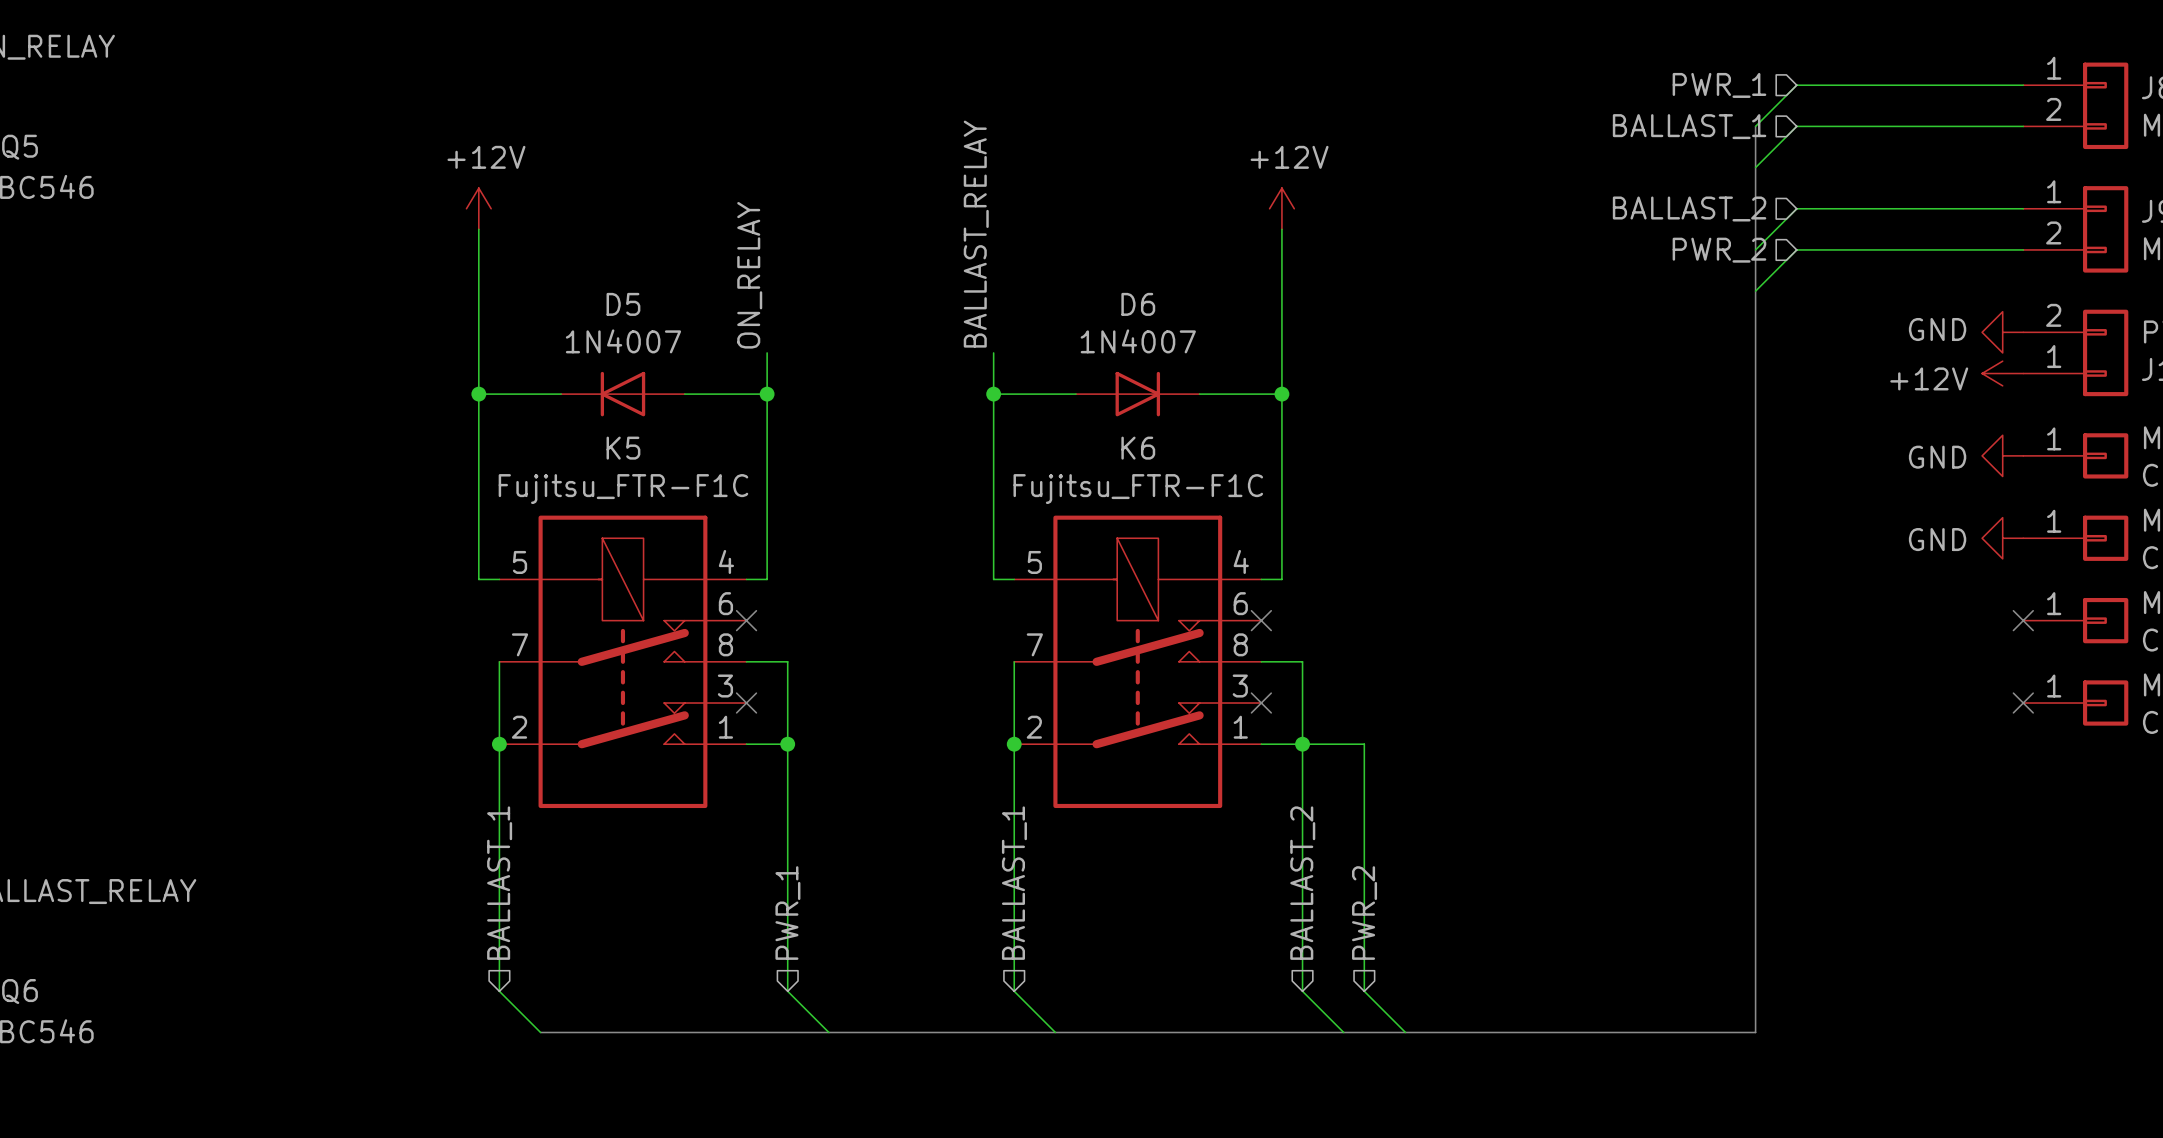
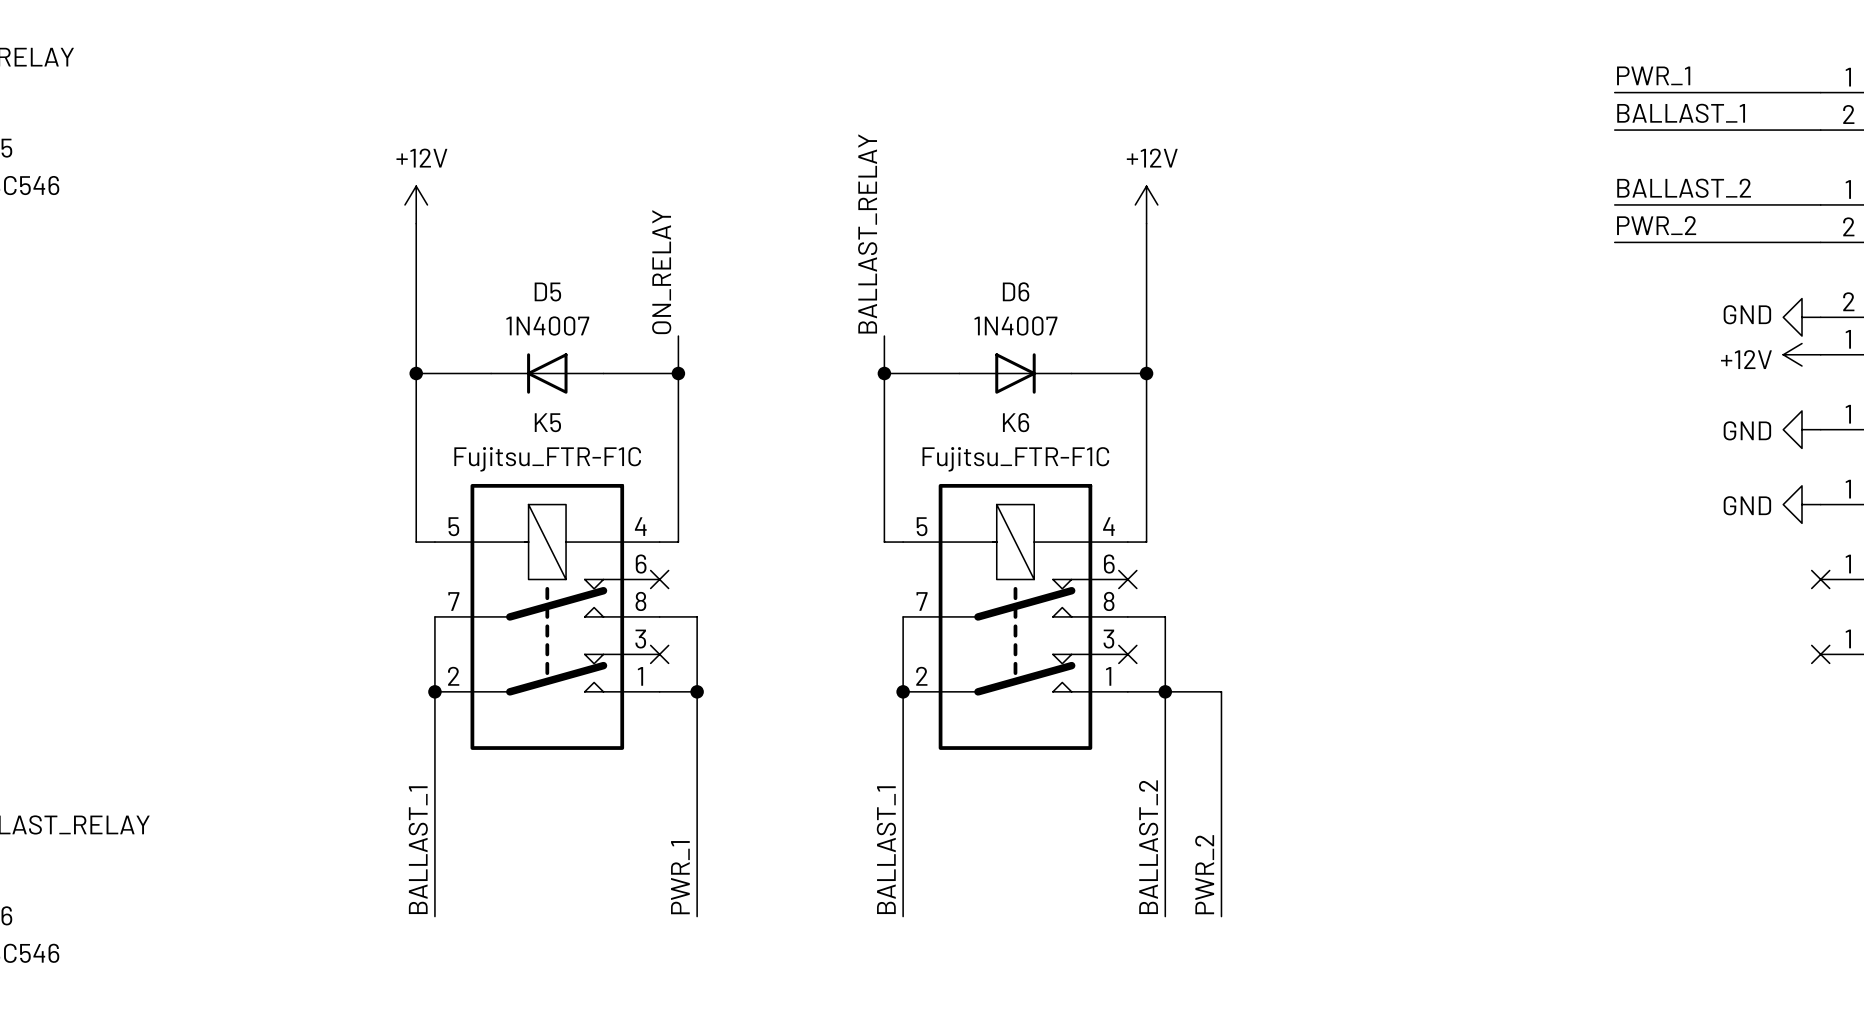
label: none -> PWR_1 (1653, 75)
hierarchical label: PWR_1 (1719, 85) -> none
wire: (1796, 85) (1755, 126) -> none
label: none -> BALLAST_1 (1681, 113)
hierarchical label: BALLAST_1 (1689, 126) -> none
bus: (1755, 126) (1755, 1032) (540, 1032) -> none
wire: (1796, 126) (1755, 167) -> none
label: none -> BALLAST_2 (1684, 188)
hierarchical label: BALLAST_2 (1689, 208) -> none
wire: (1796, 208) (1755, 249) -> none
label: none -> PWR_2 (1656, 225)
wire: (1796, 249) (1755, 291) -> none
hierarchical label: PWR_2 (1719, 250) -> none
hierarchical label: BALLAST_1 (499, 883) -> none
hierarchical label: BALLAST_1 (1014, 883) -> none
hierarchical label: BALLAST_2 (1302, 883) -> none
label: none -> BALLAST_1 (418, 850)
label: none -> BALLAST_1 (886, 850)
label: none -> BALLAST_2 (1148, 847)
hierarchical label: PWR_1 (787, 913) -> none
hierarchical label: PWR_2 (1364, 913) -> none
label: none -> PWR_1 (680, 877)
label: none -> PWR_2 (1204, 874)
wire: (499, 991) (540, 1032) -> none
wire: (787, 991) (828, 1032) -> none
wire: (1014, 991) (1055, 1032) -> none
wire: (1302, 991) (1343, 1032) -> none
wire: (1364, 991) (1405, 1032) -> none

